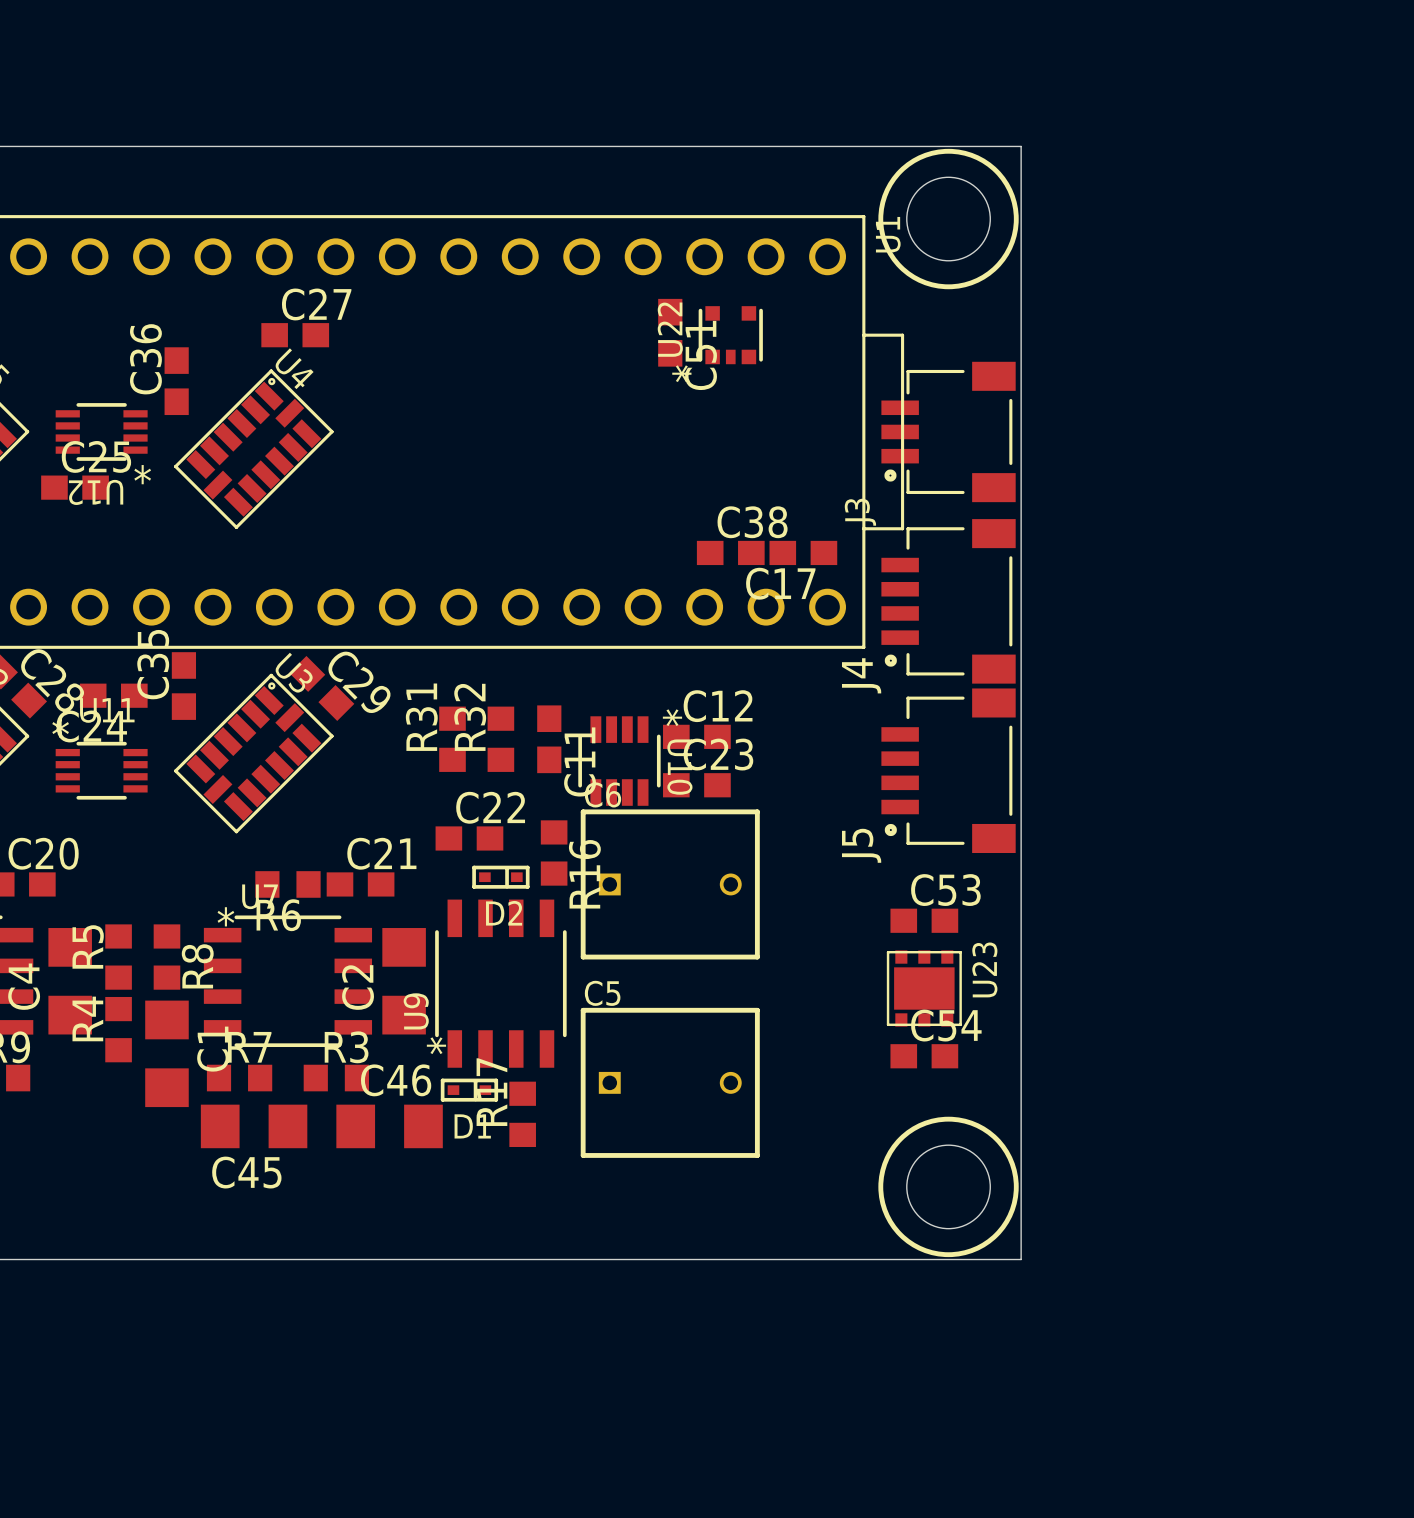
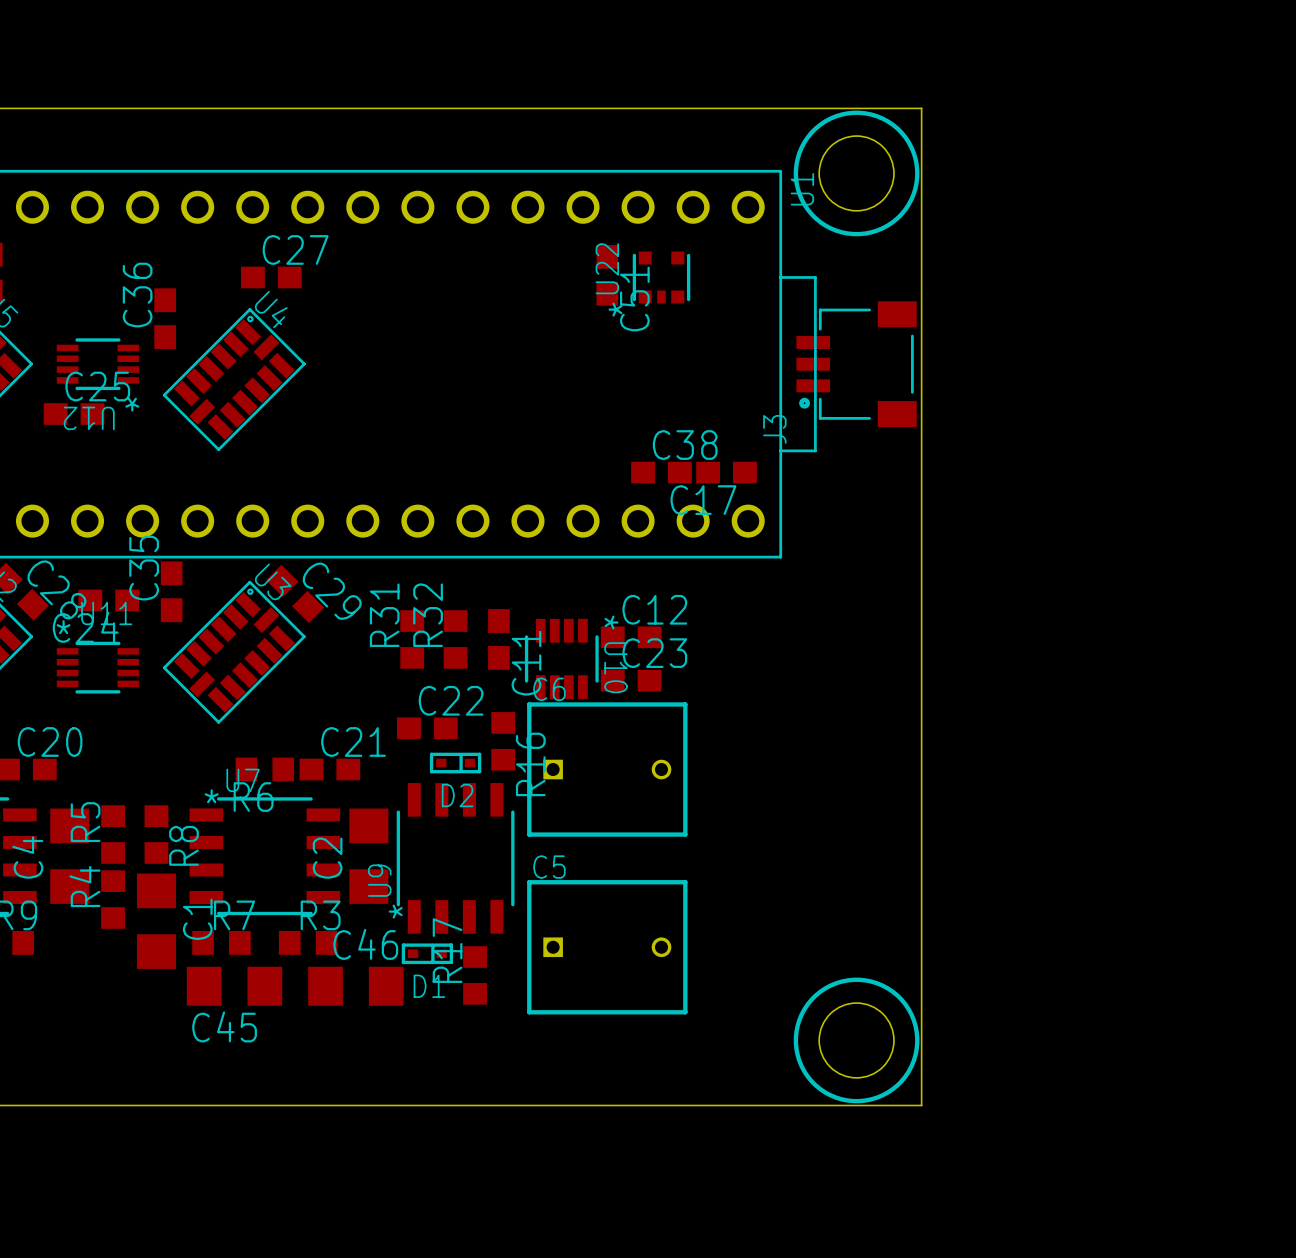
J4: (948, 601) -> none
J5: (948, 770) -> none
C53: (924, 920) -> none
U23: (924, 988) -> none
C54: (924, 1056) -> none

